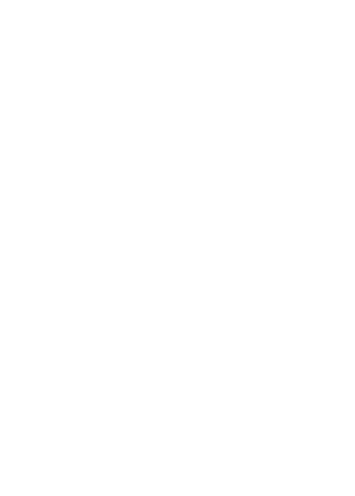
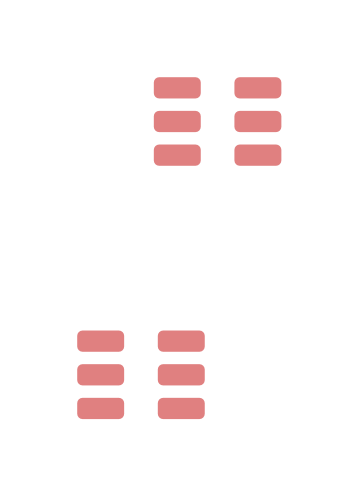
part: none -> (217, 121)
part: none -> (140, 374)

